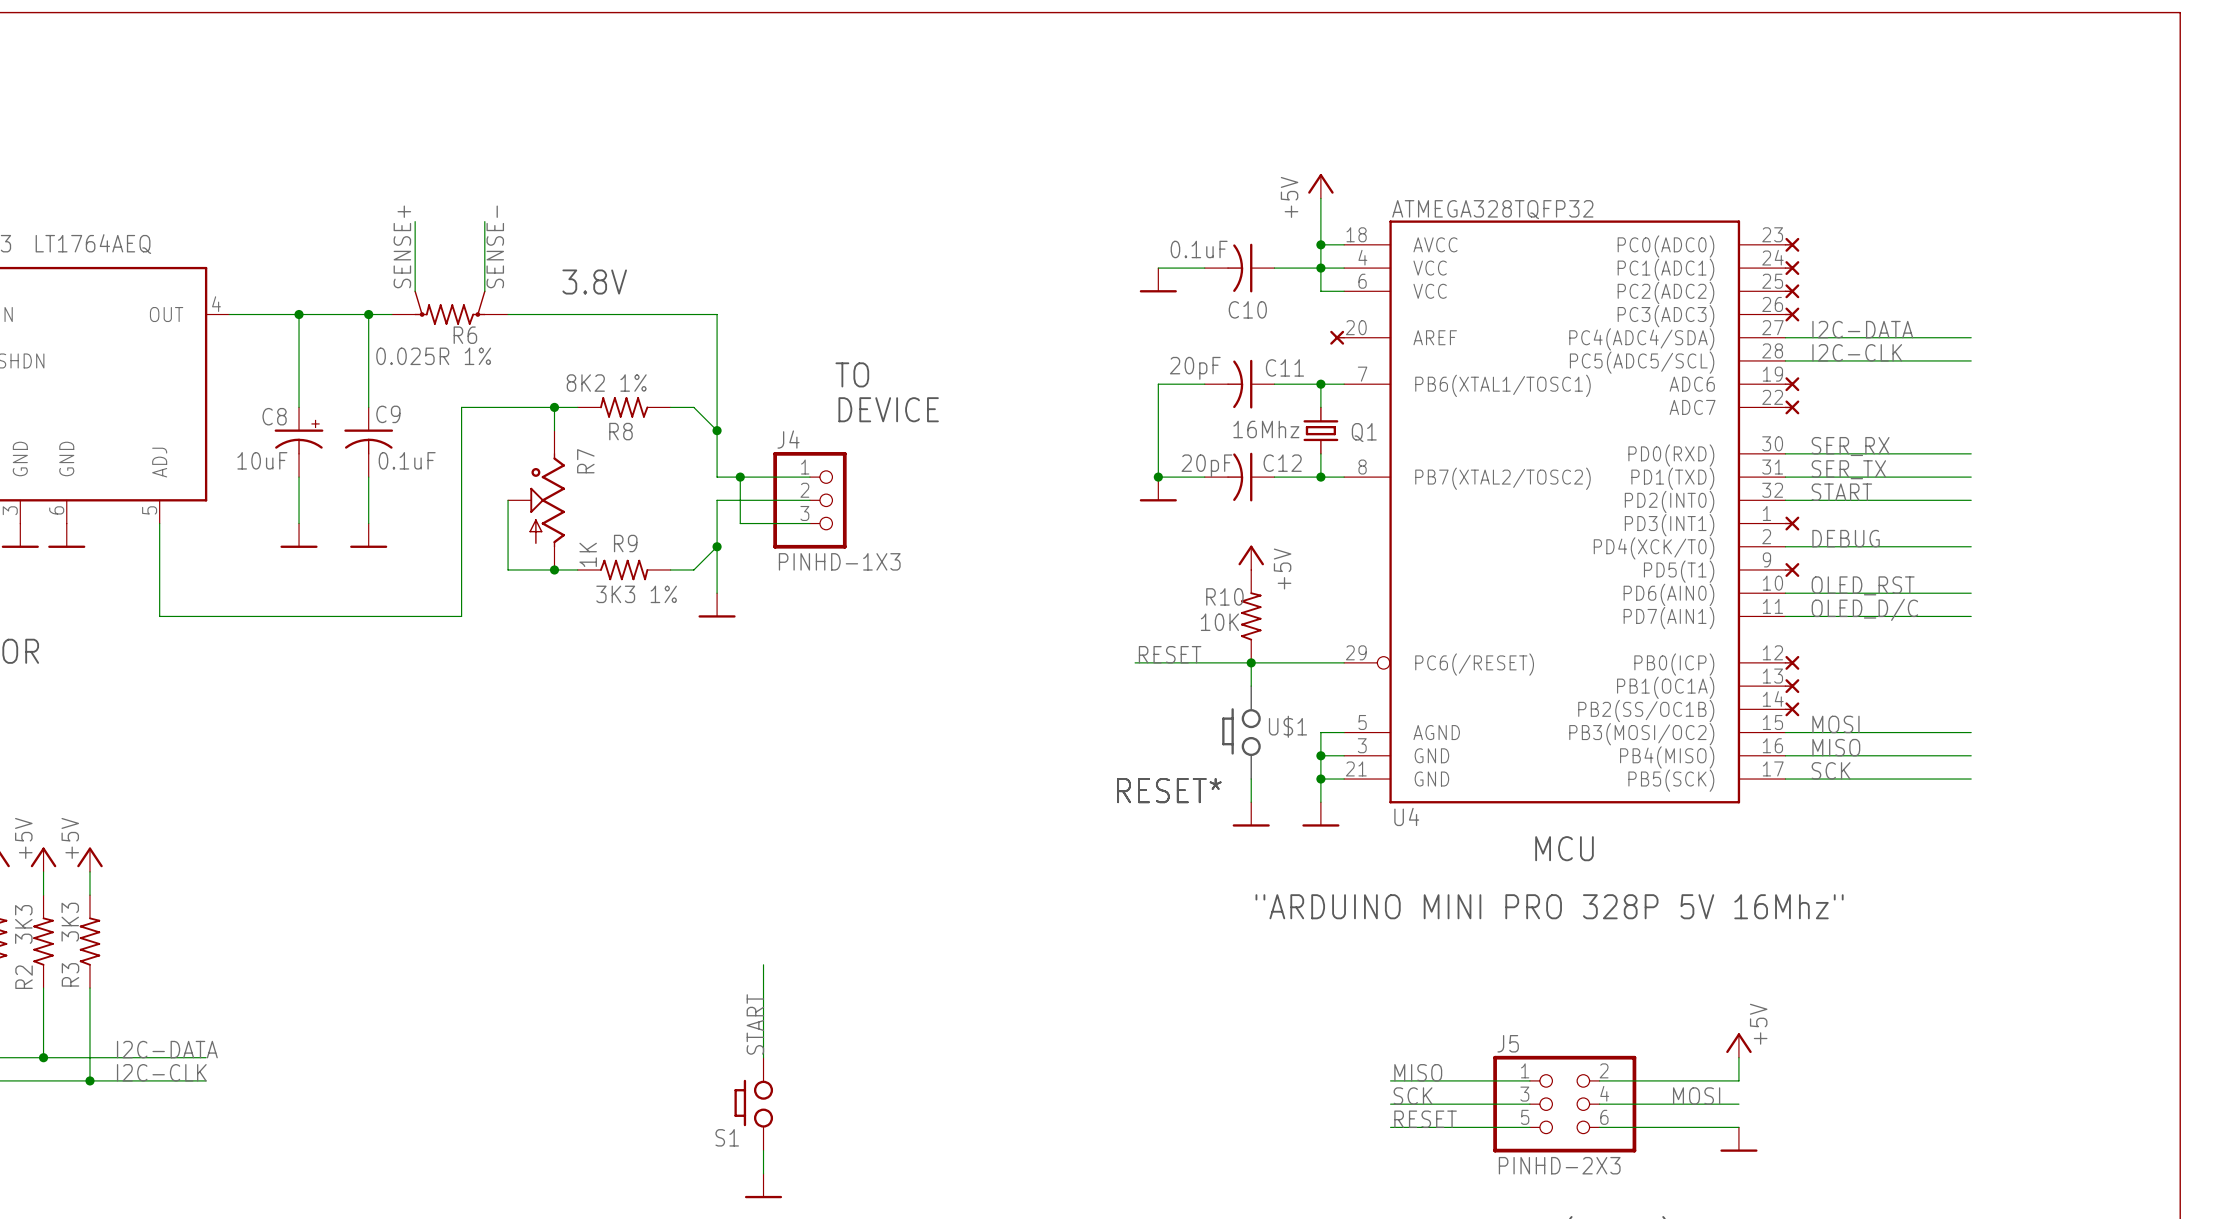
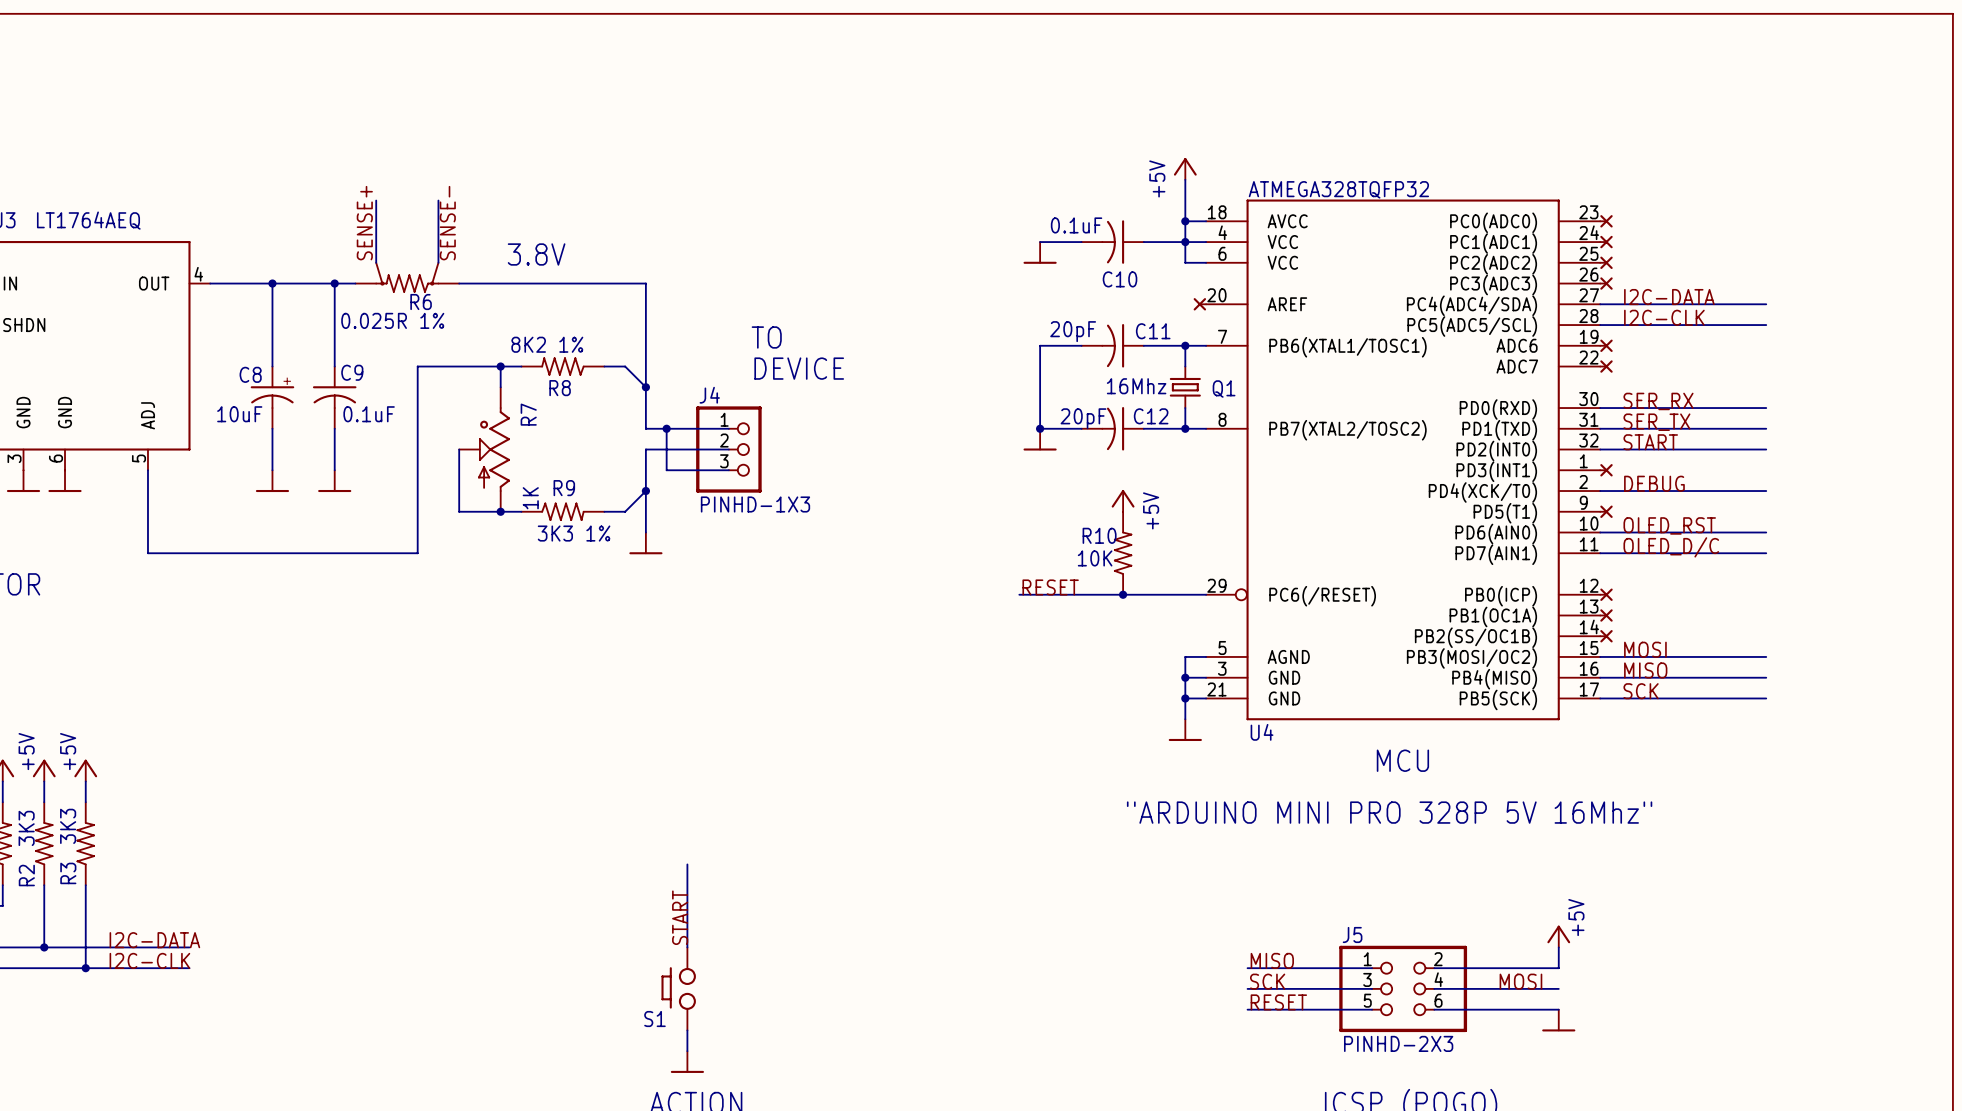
wire: (1251, 662) (1251, 686) -> none
U$1: (1241, 732) -> none
wire: (1251, 779) (1251, 802) -> none
text: RESET* (1169, 790) -> none
power symbol: (1251, 814) -> none

